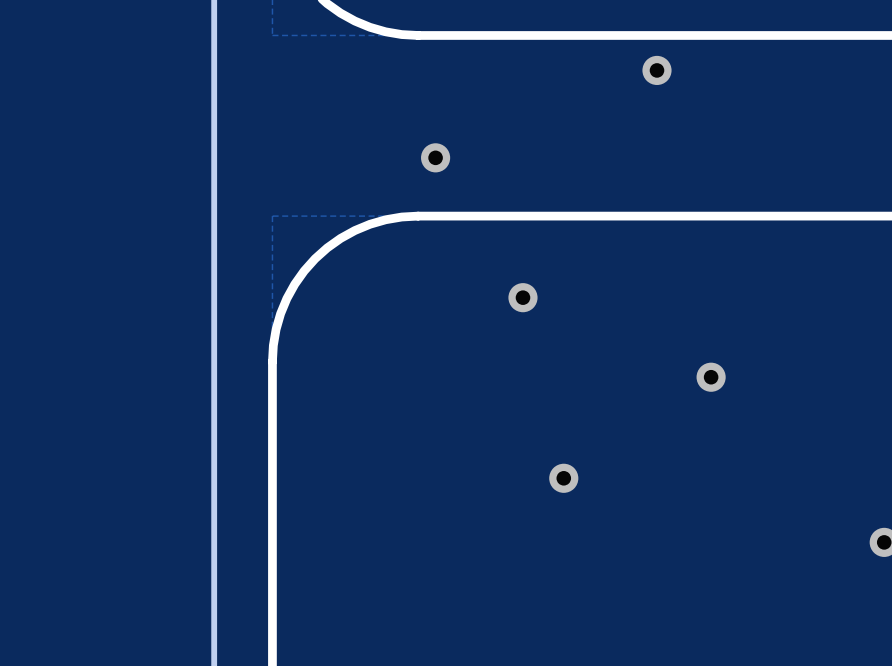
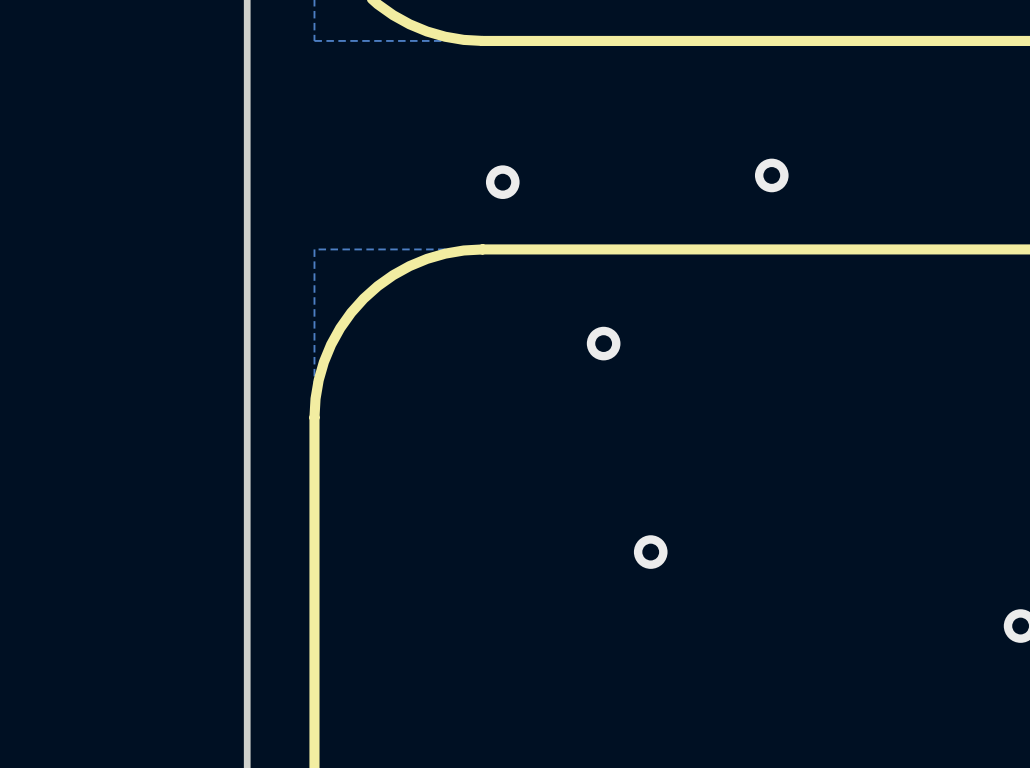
via position: (656, 70) -> (771, 175)
via: (711, 377) -> none

